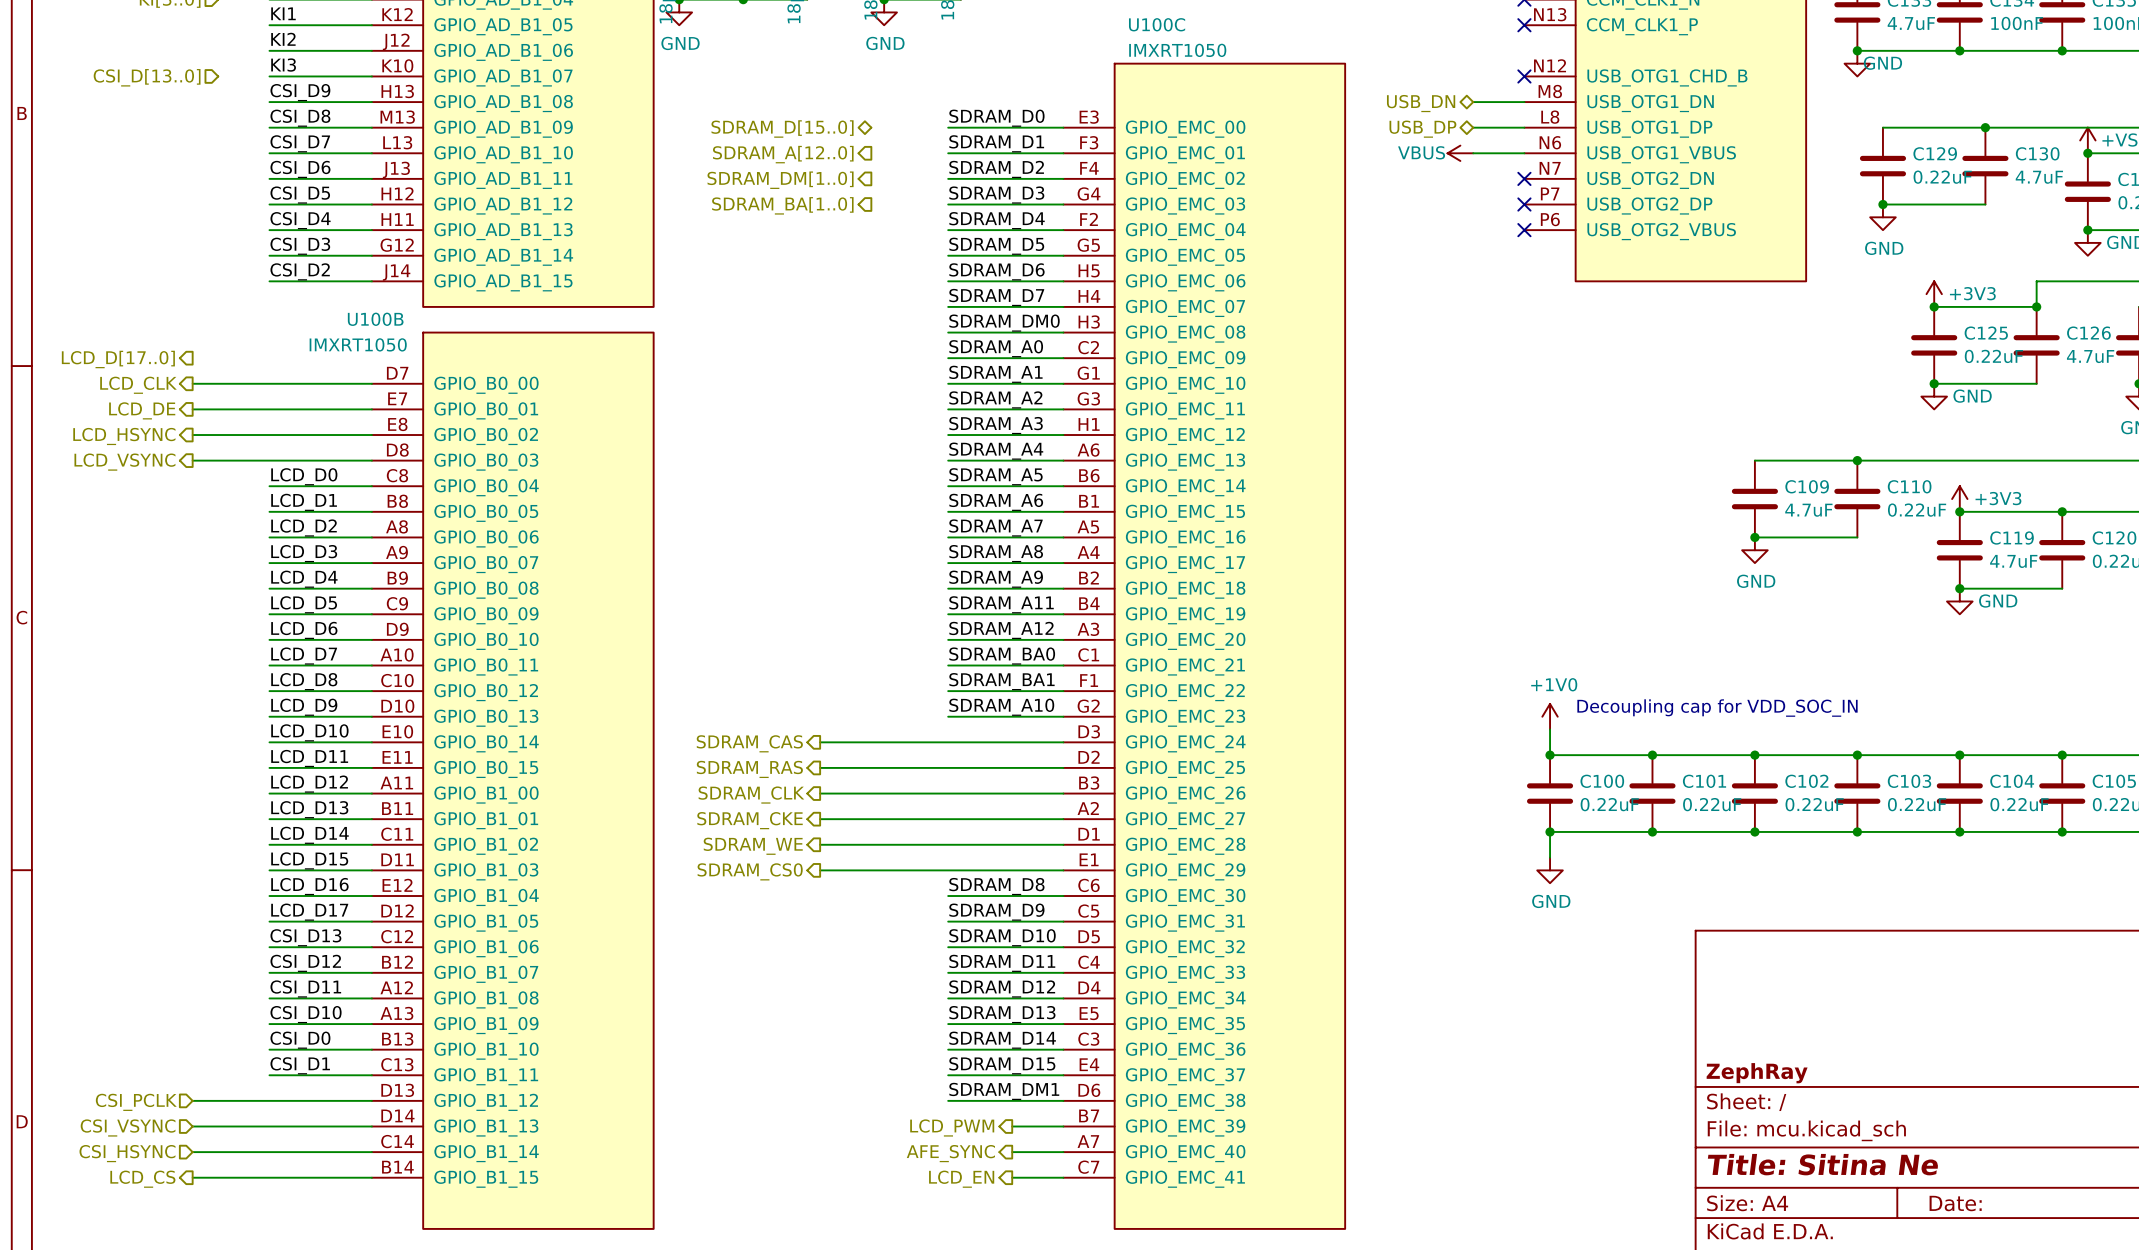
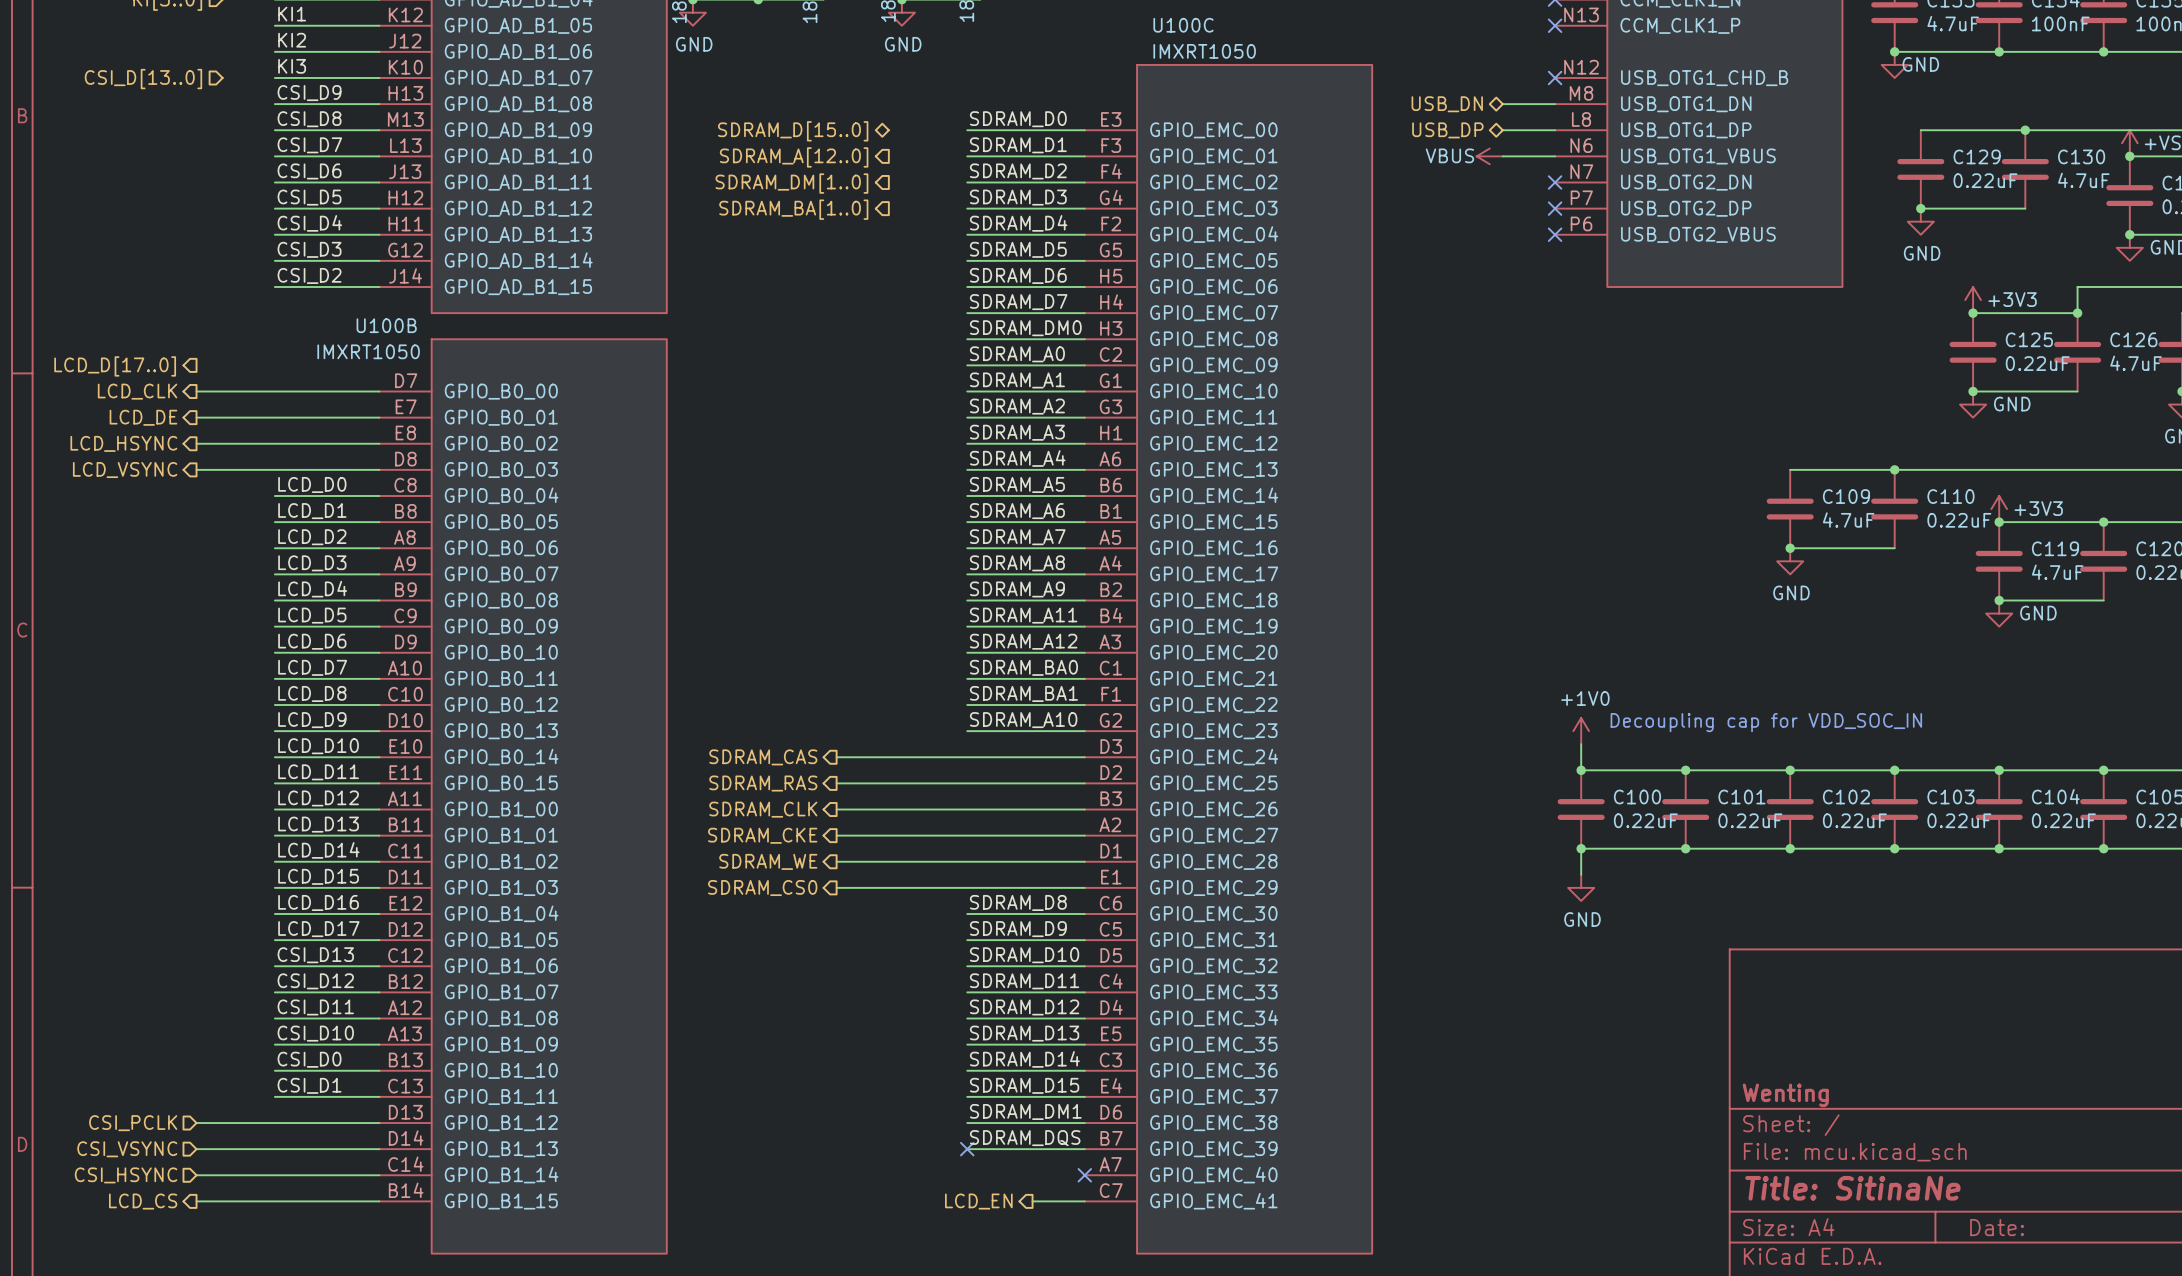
title block: ZephRay (1757, 1073) -> Wenting (1785, 1095)
label: none -> SDRAM_DQS (1025, 1138)
wire: none -> (967, 1149) (1032, 1149)
no-connect mark: none -> (967, 1149)
hierarchical label: LCD_PWM (952, 1127) -> none
wire: (1012, 1152) (1063, 1152) -> none
no-connect mark: none -> (1084, 1175)
hierarchical label: AFE_SYNC (950, 1153) -> none
title block: Title: Sitina Ne (1823, 1164) -> Title: SitinaNe (1852, 1188)

